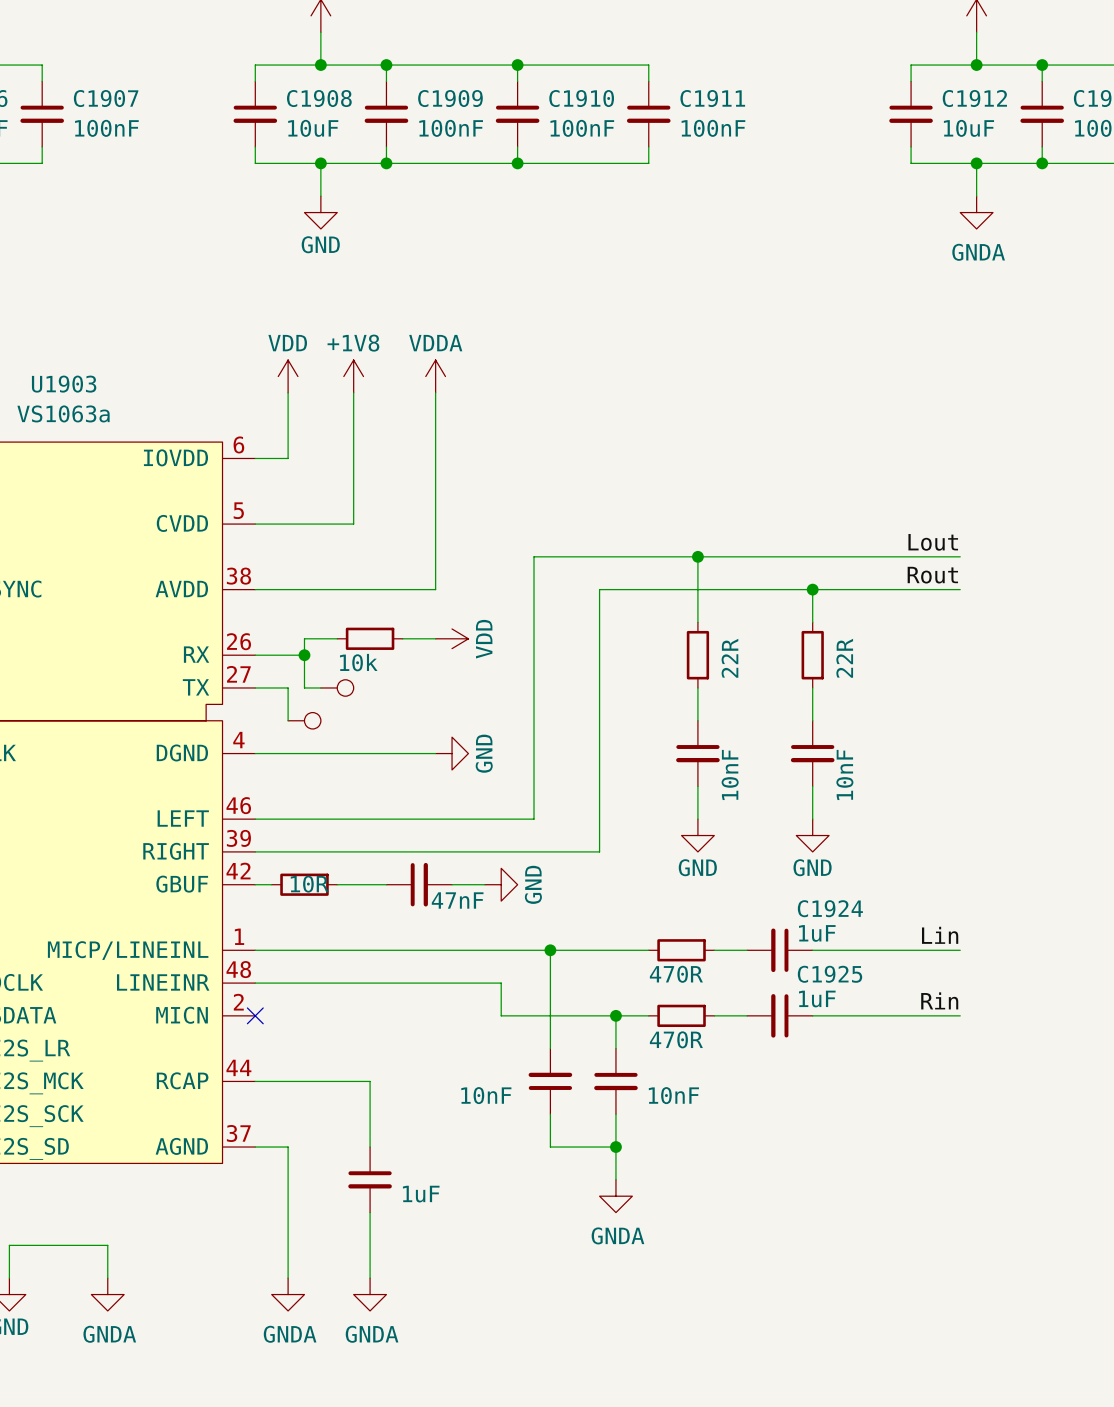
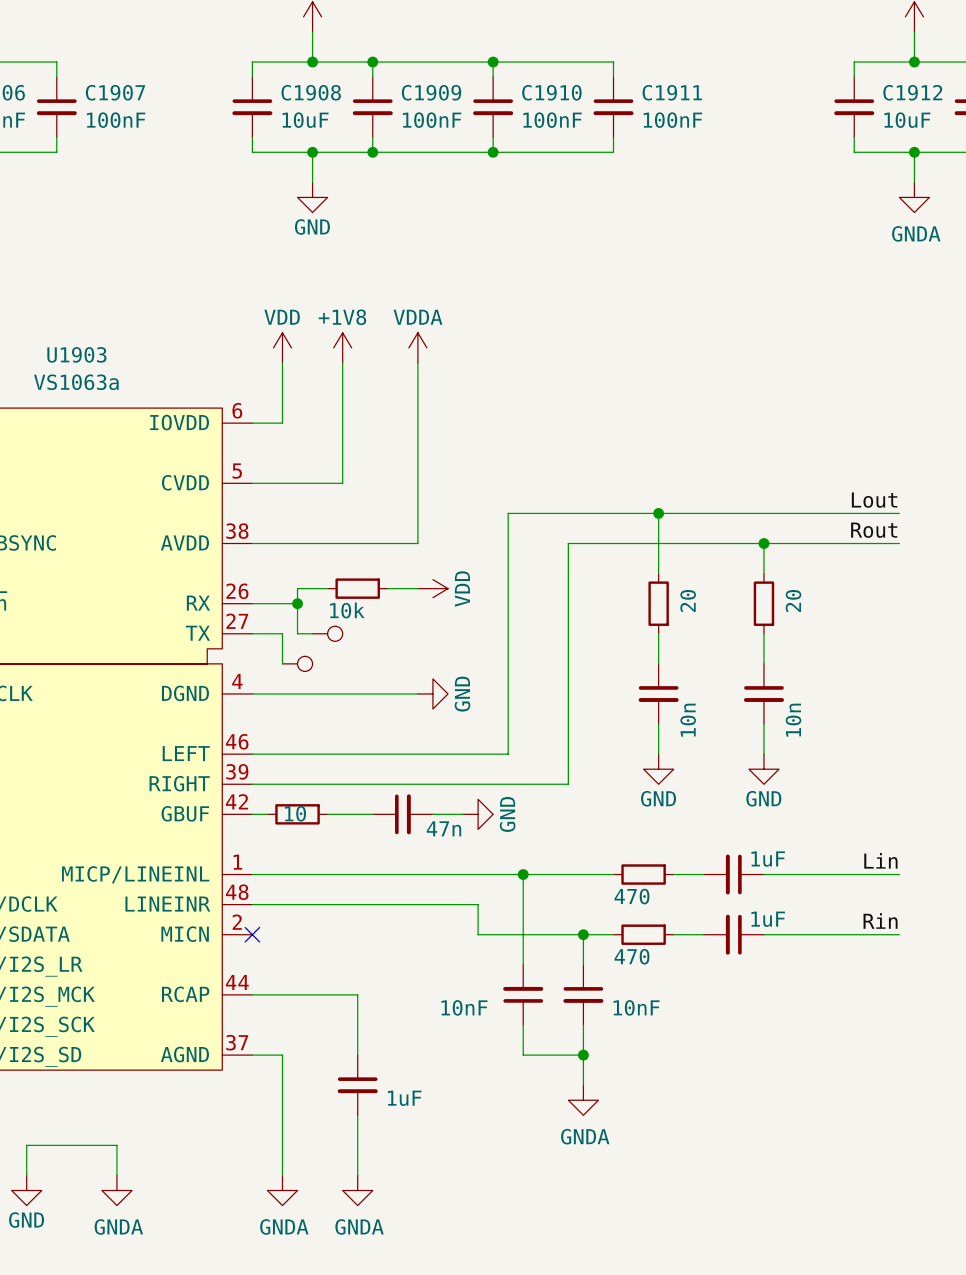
part value: 22R (729, 658) -> 20 (688, 600)
part value: 22R (844, 658) -> 20 (793, 600)
part value: 10nF (730, 774) -> 10n (688, 720)
part value: 10nF (844, 774) -> 10n (793, 720)
part value: 10R (309, 884) -> 10 (295, 813)
part value: 47nF (457, 900) -> 47n (443, 828)
C1924 name: C1924 (830, 908) -> none
part value: 470R (676, 974) -> 470 (631, 896)
C1925 name: C1925 (830, 974) -> none
part value: 470R (676, 1039) -> 470 (631, 956)

